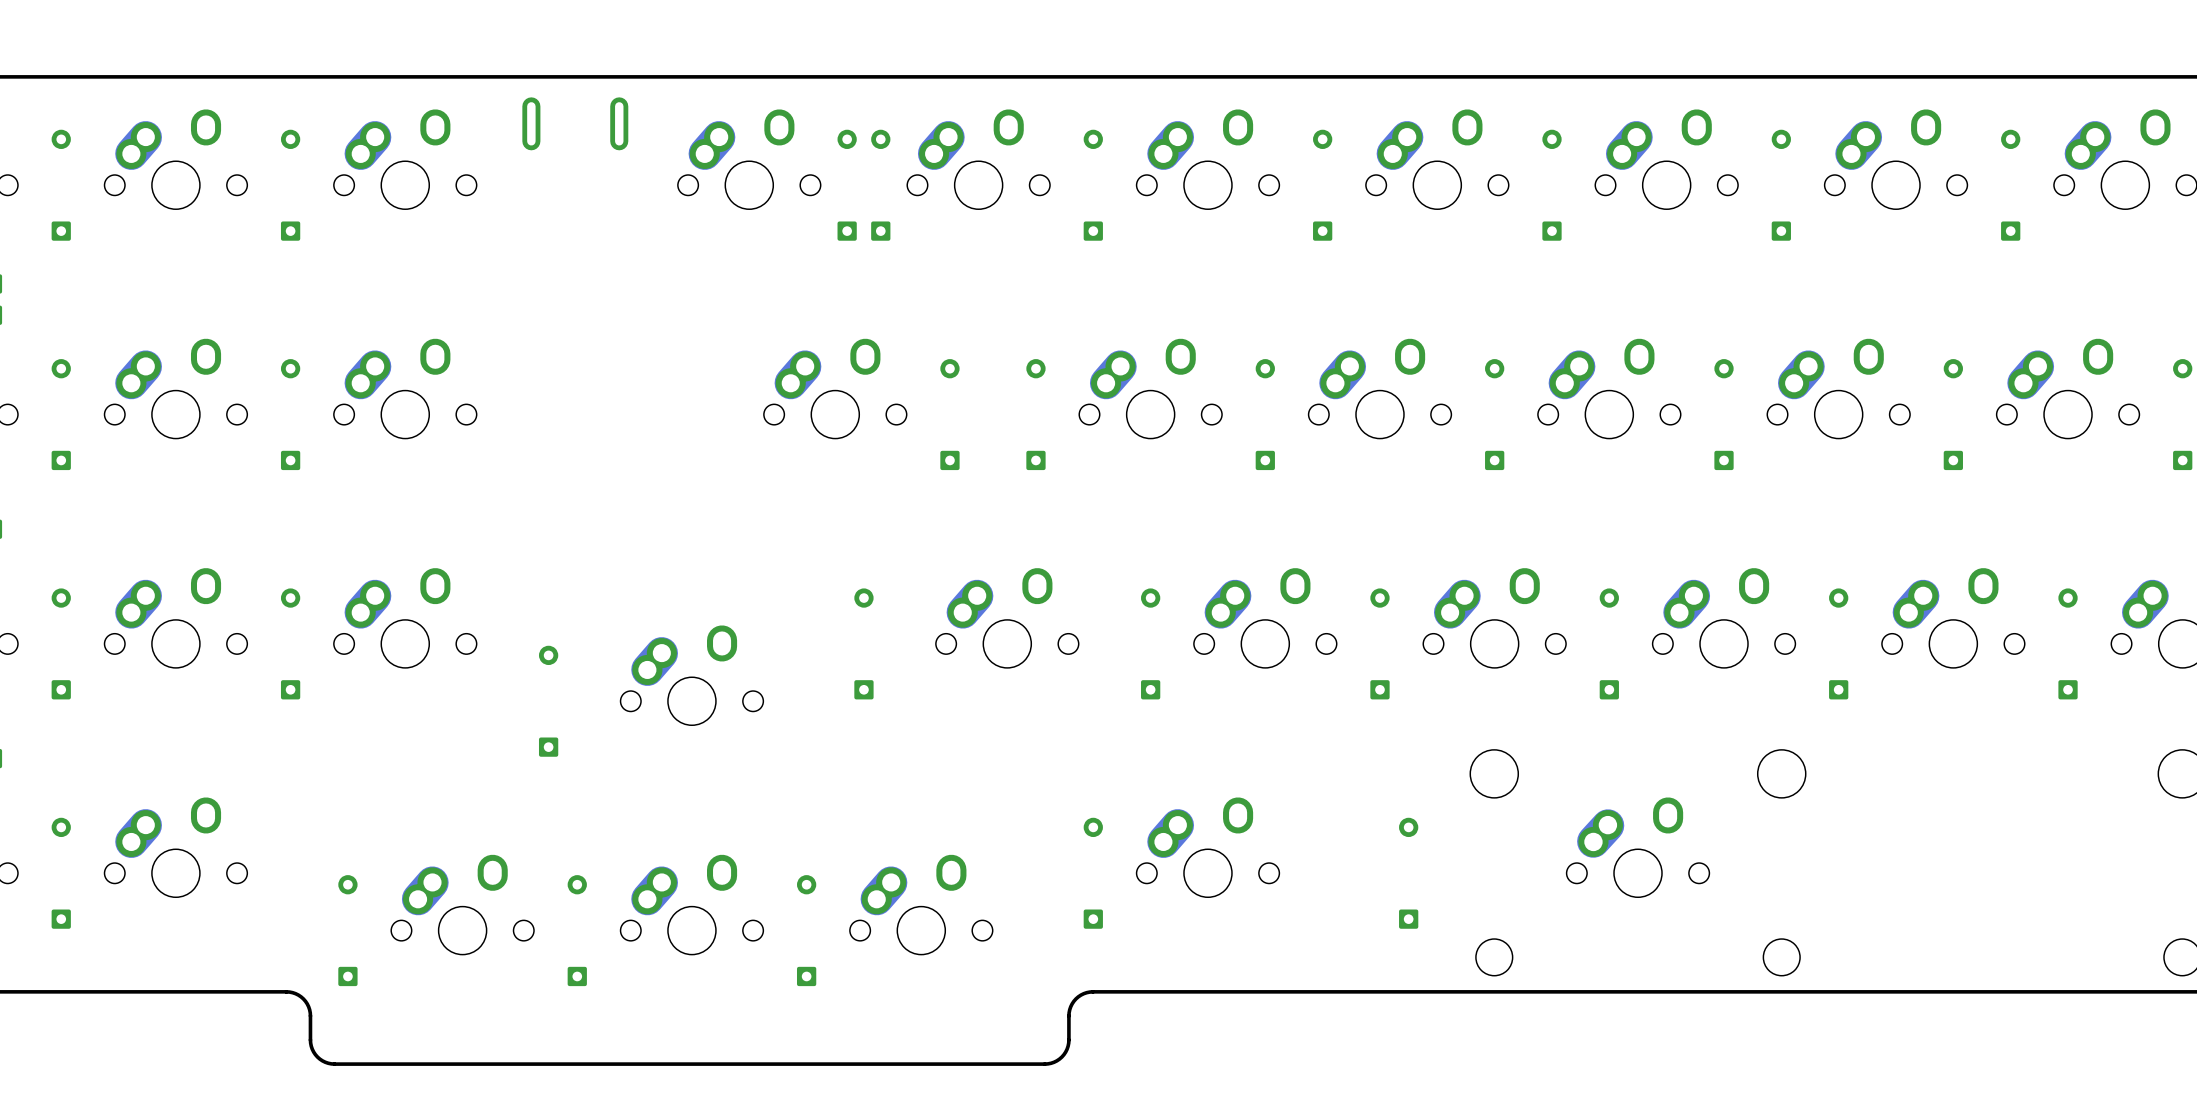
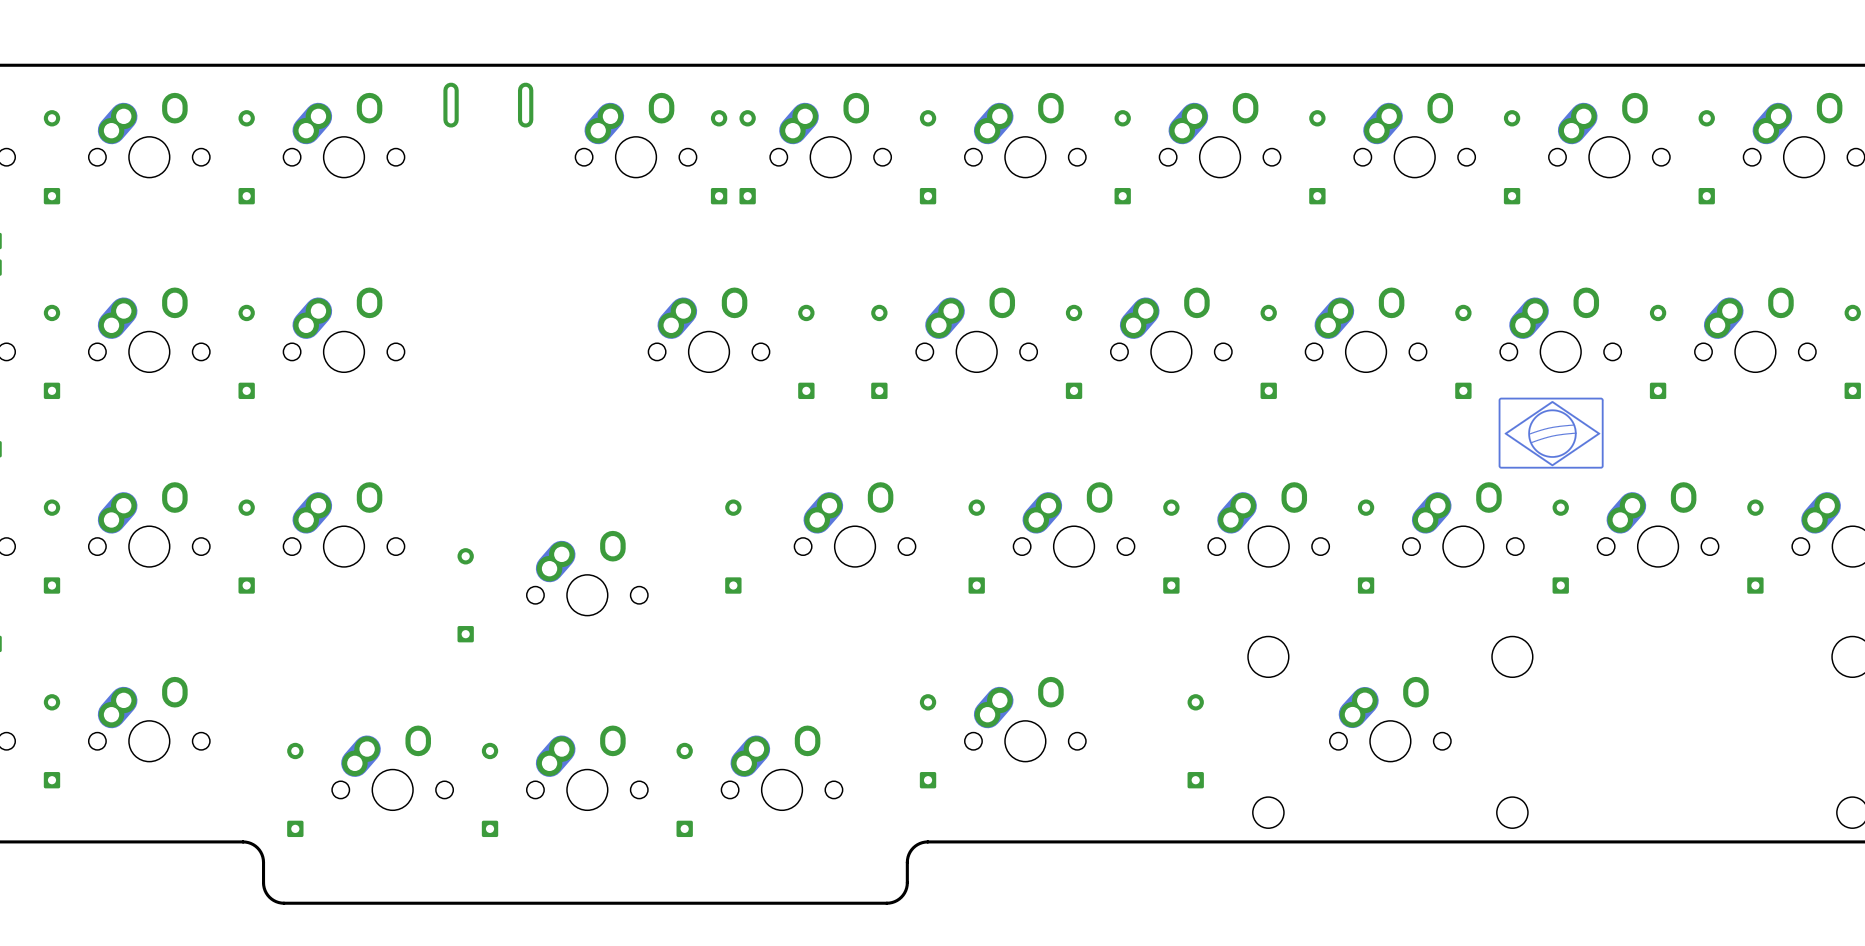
part: none -> (1551, 433)

